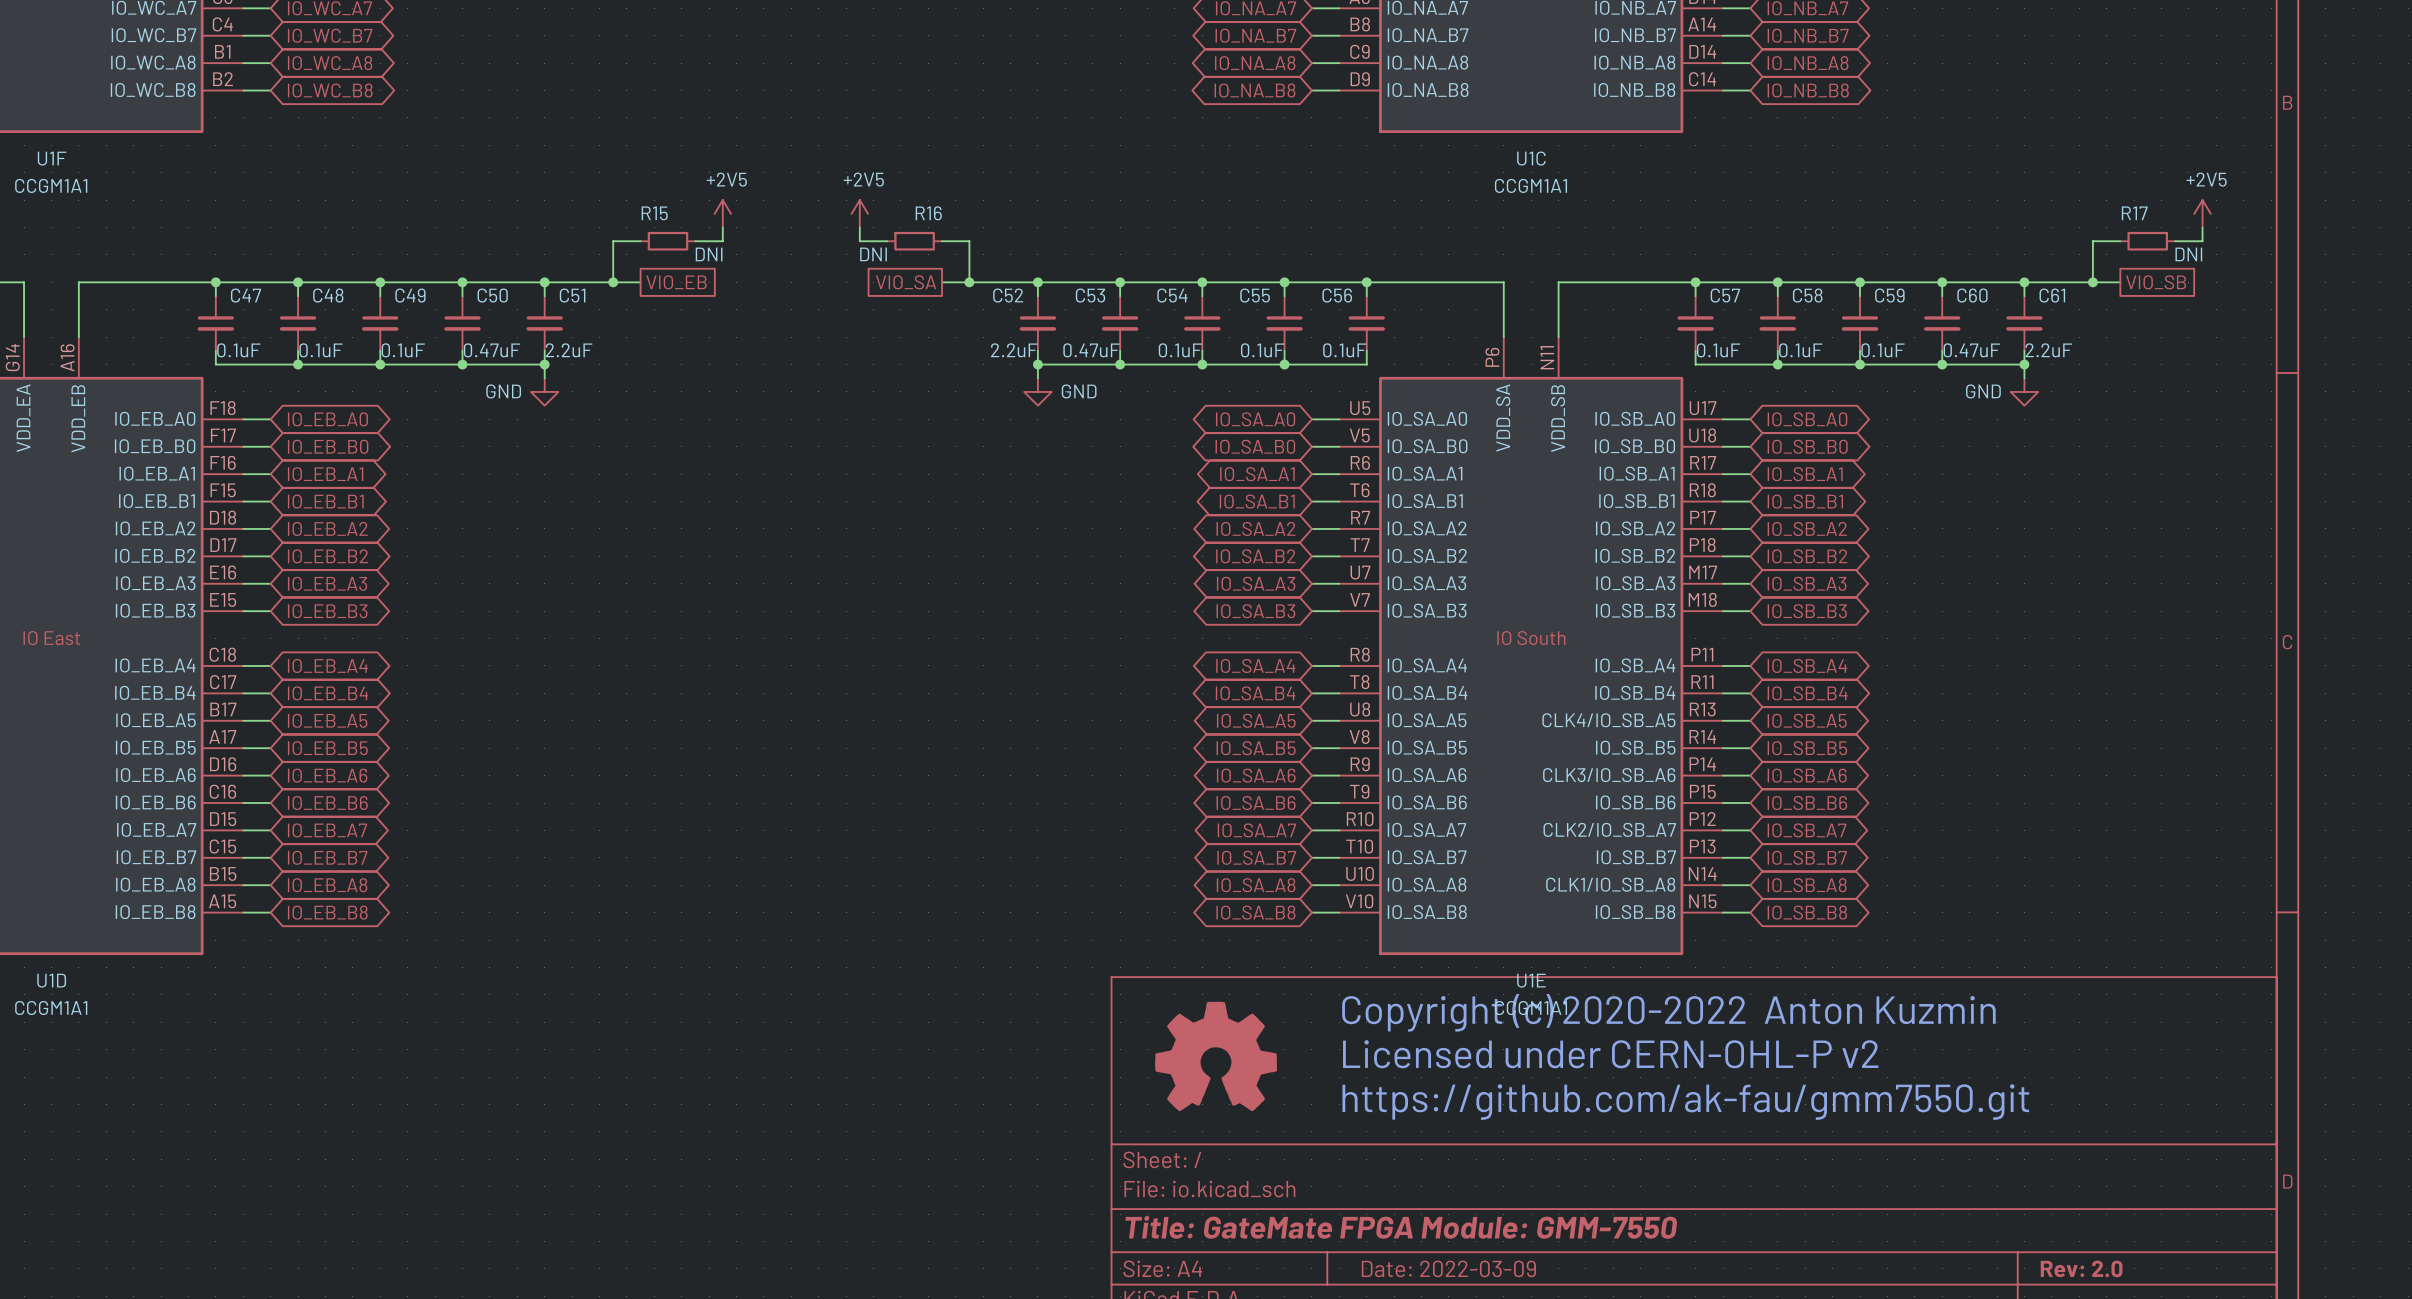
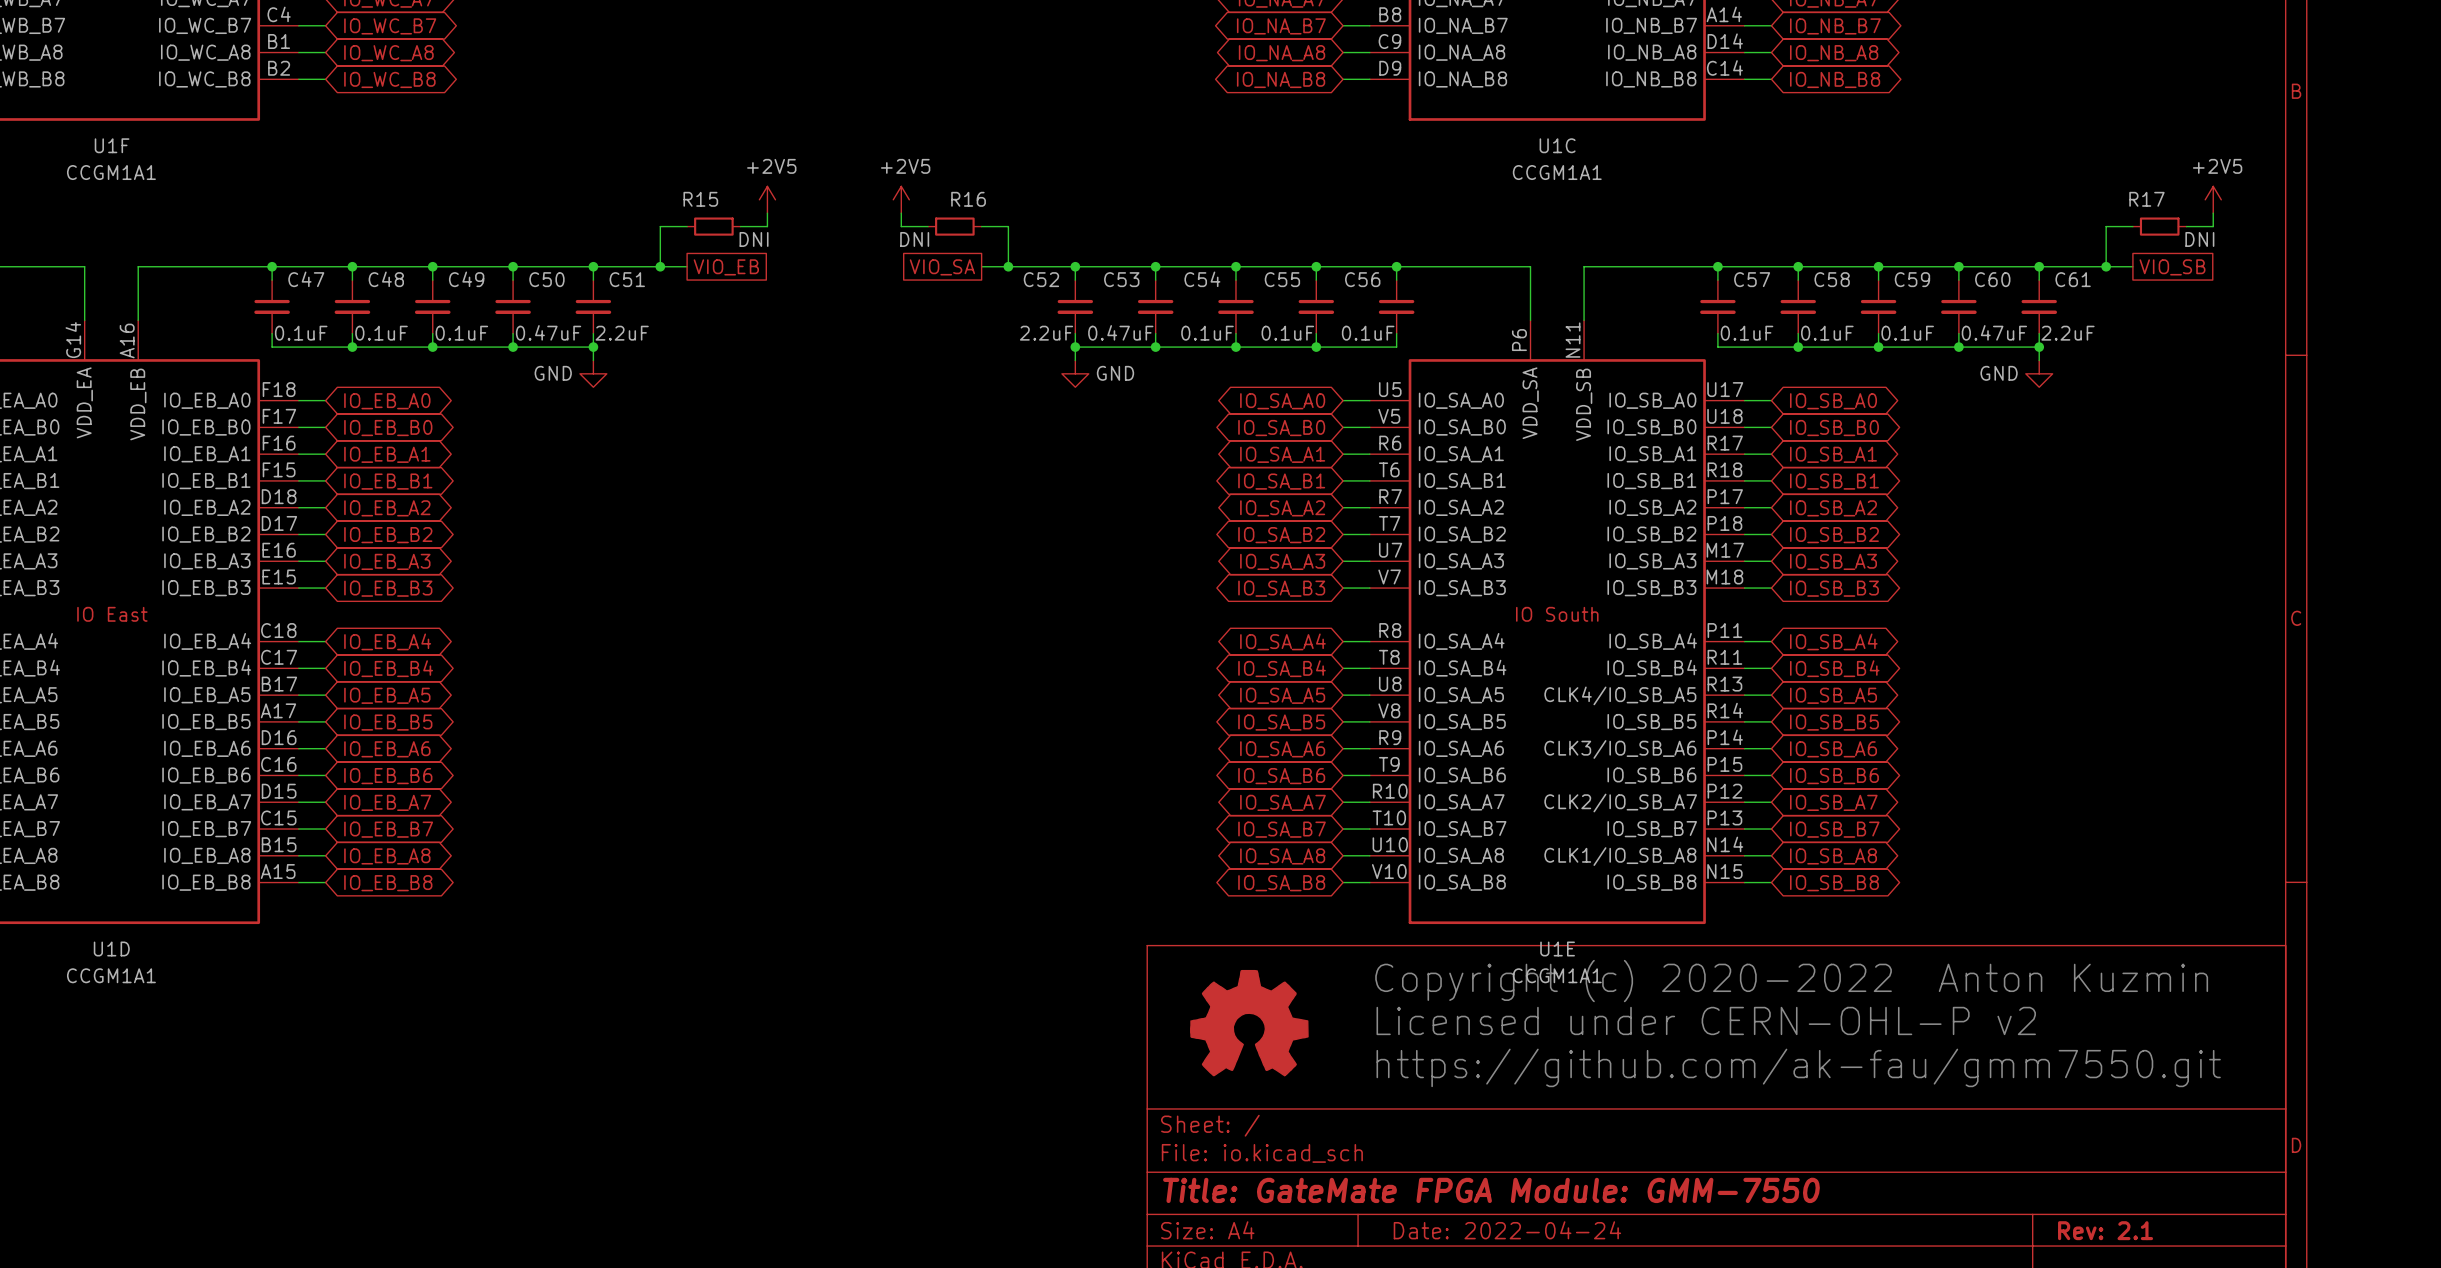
title block: Date: 2022-03-09 (1448, 1268) -> Date: 2022-04-24 (1507, 1230)
title block: Rev: 2.0 (2081, 1268) -> Rev: 2.1 (2105, 1230)

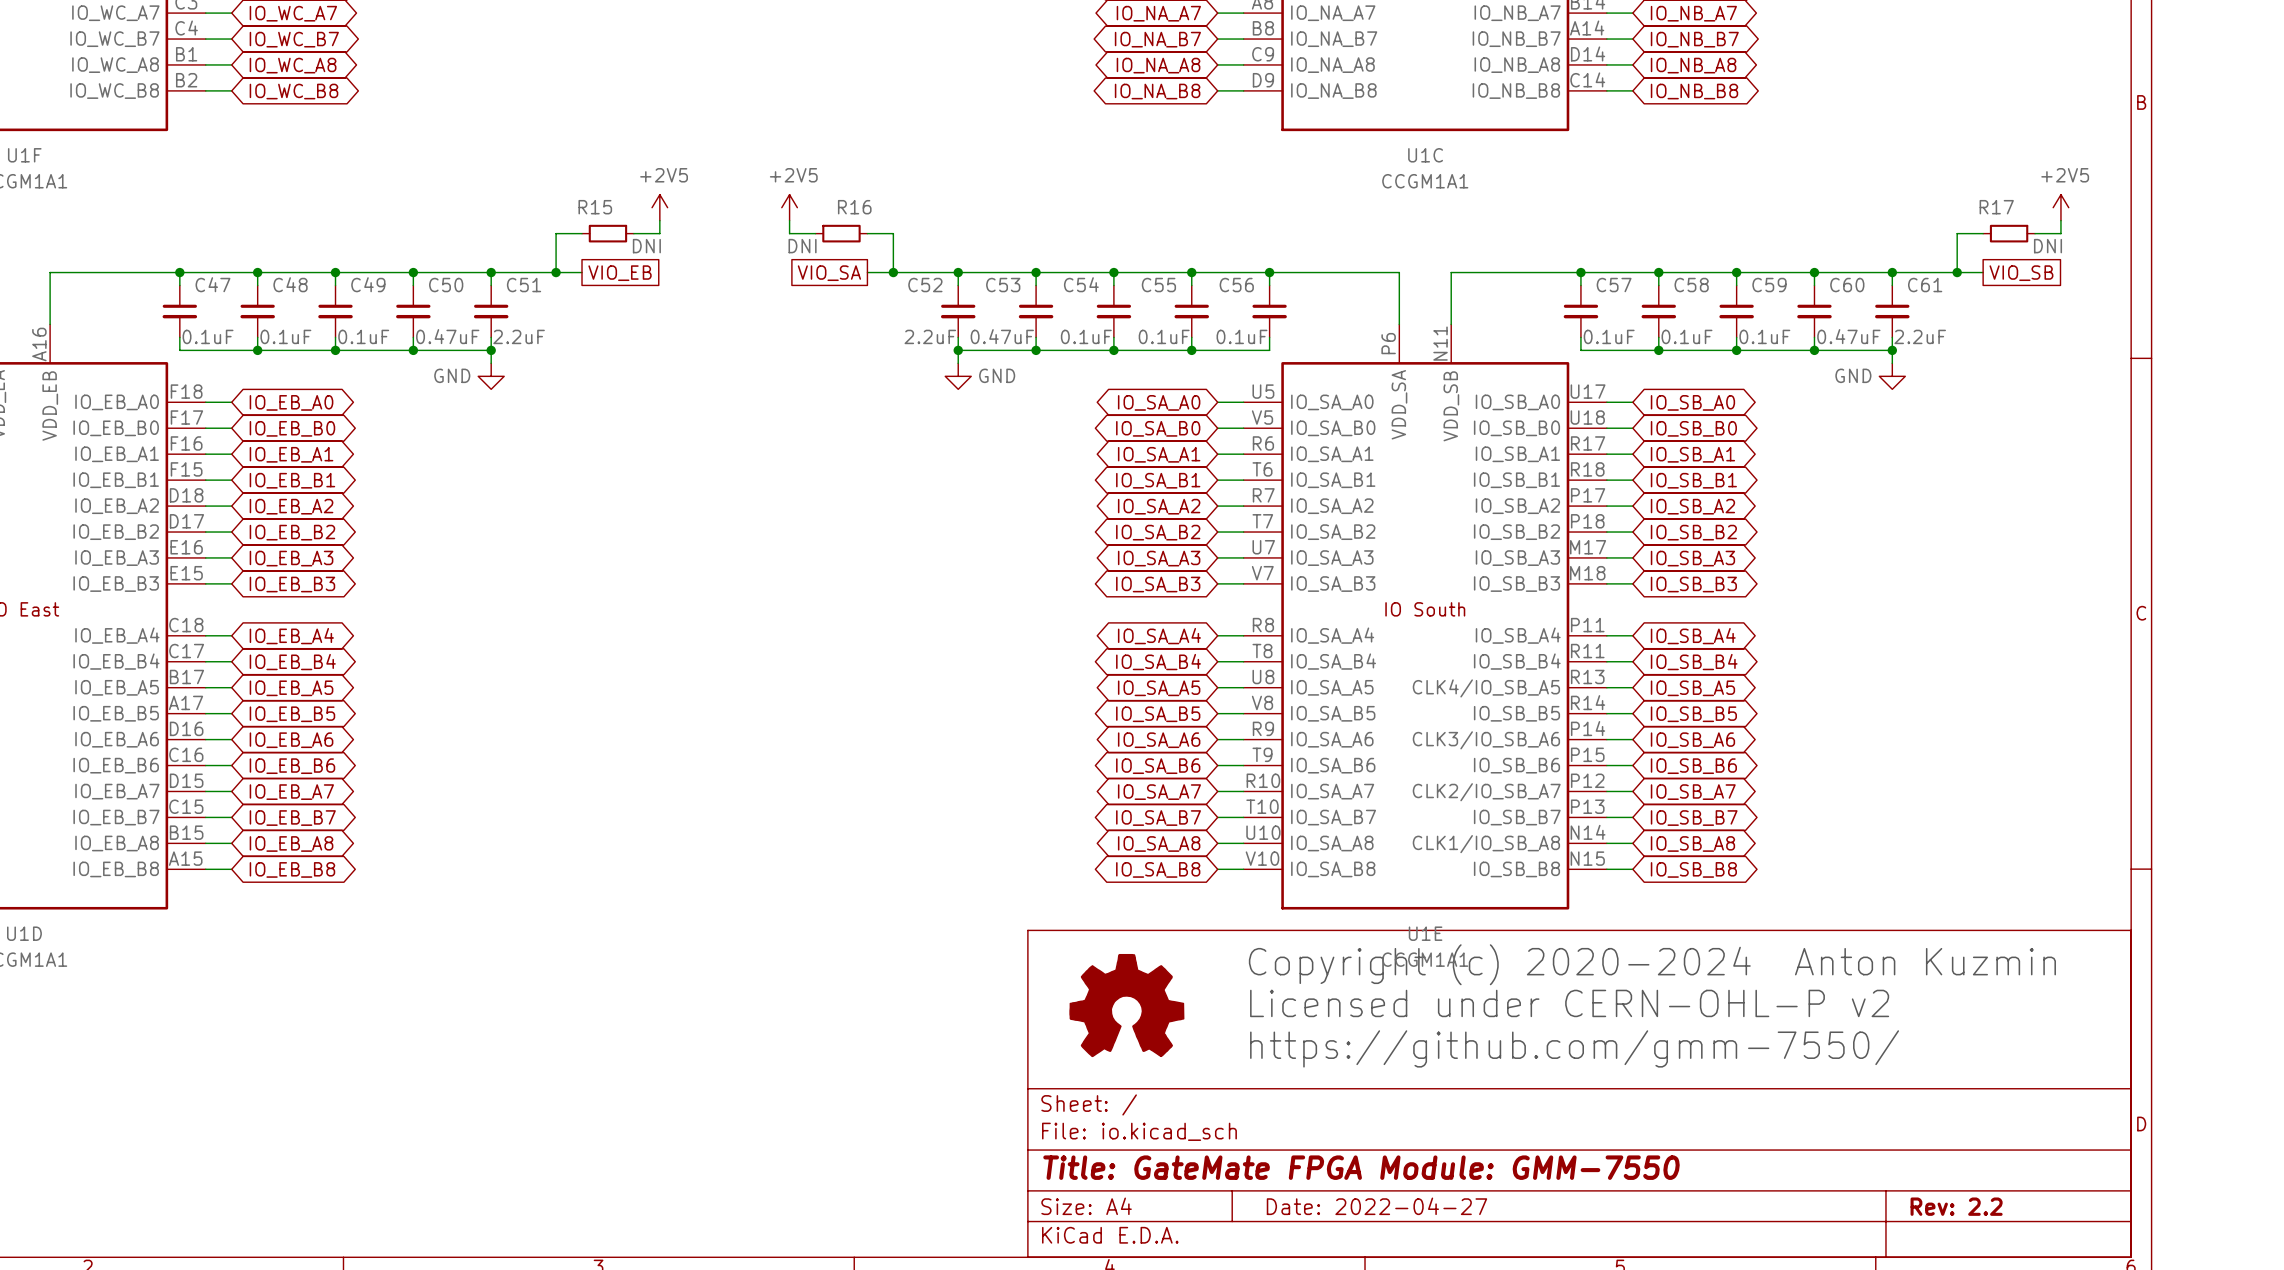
text: Copyright (c) 2020-2022 Anton Kuzmin (1791, 981) -> Copyright (c) 2020-2024 Anton Kuzmin (1652, 964)
text: https://github.com/ak-fau/gmm7550.git (1798, 1067) -> https://github.com/gmm-7550/ (1574, 1048)
title block: Date: 2022-04-24 (1507, 1230) -> Date: 2022-04-27 (1376, 1206)
title block: Rev: 2.1 (2105, 1230) -> Rev: 2.2 (1956, 1206)

